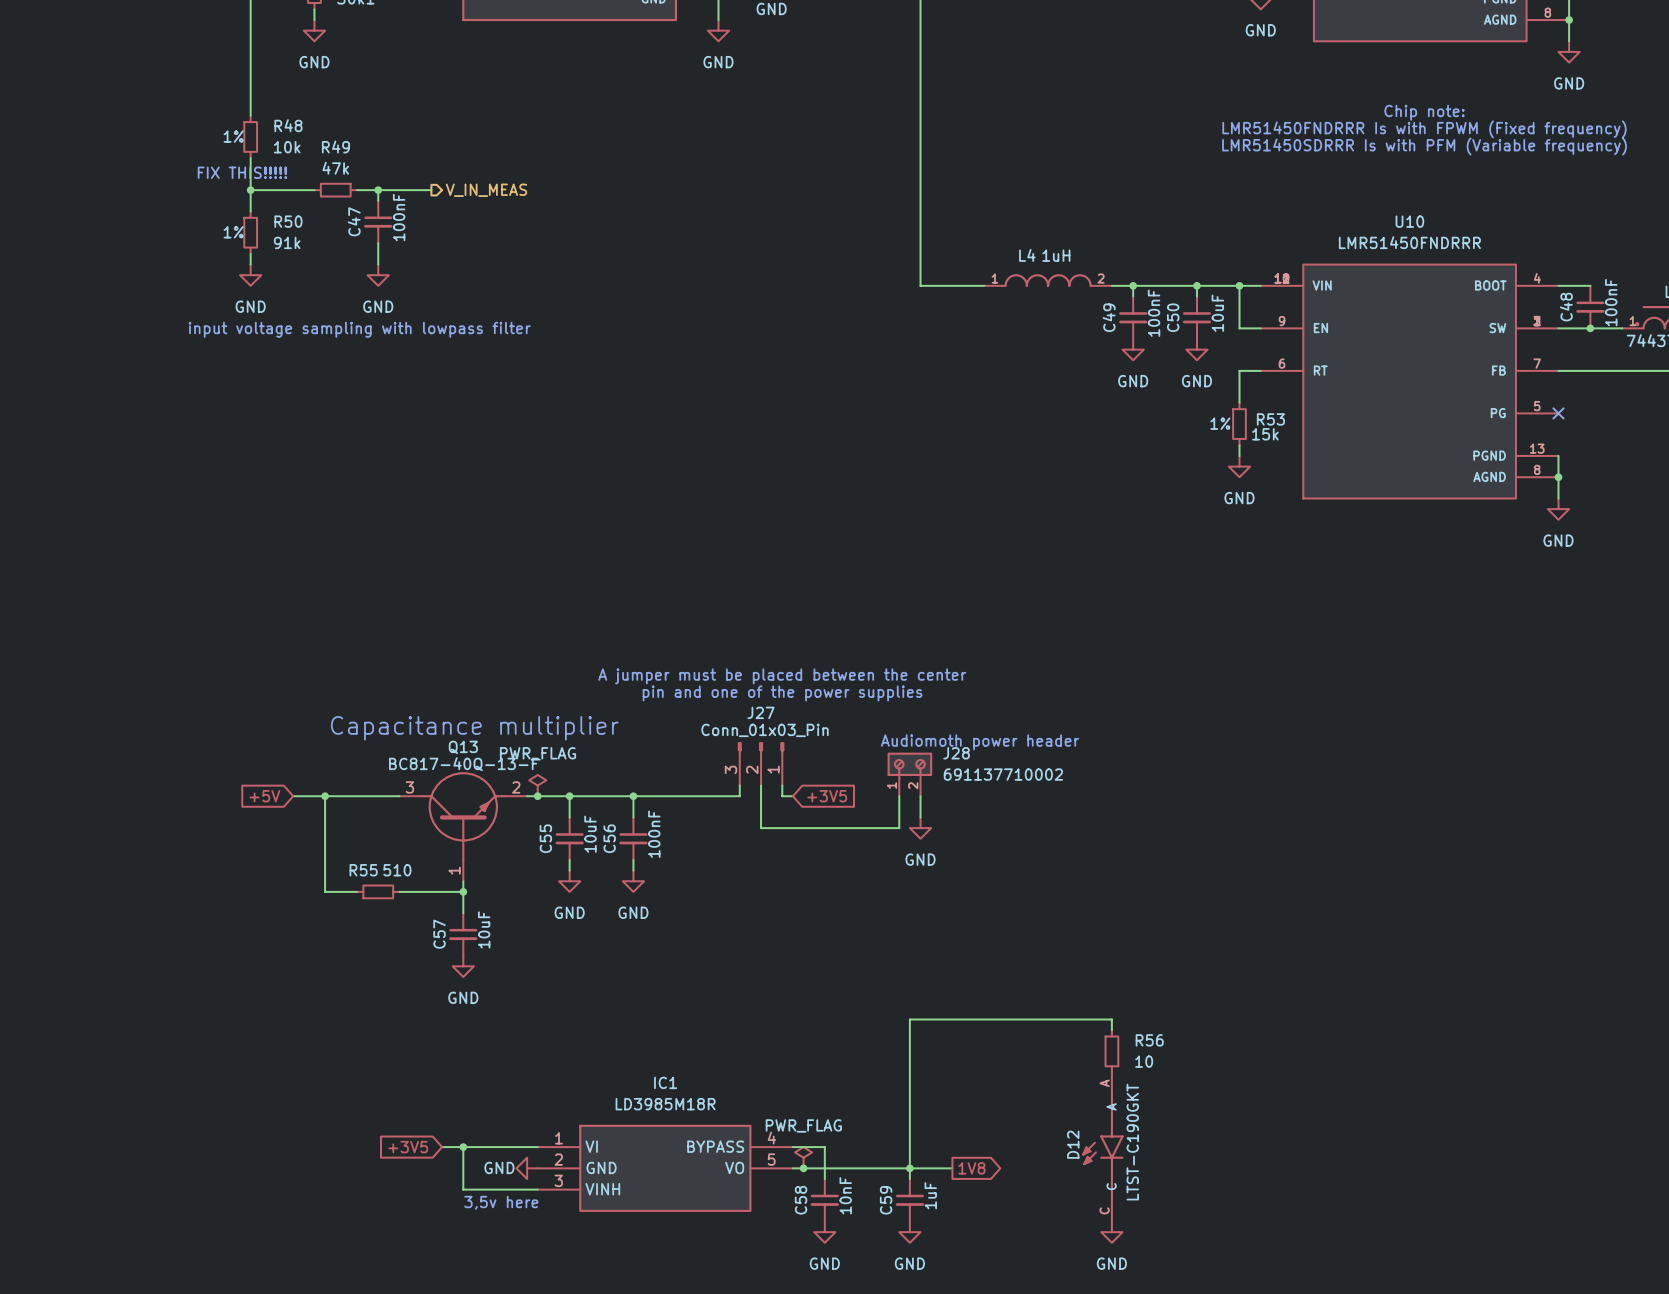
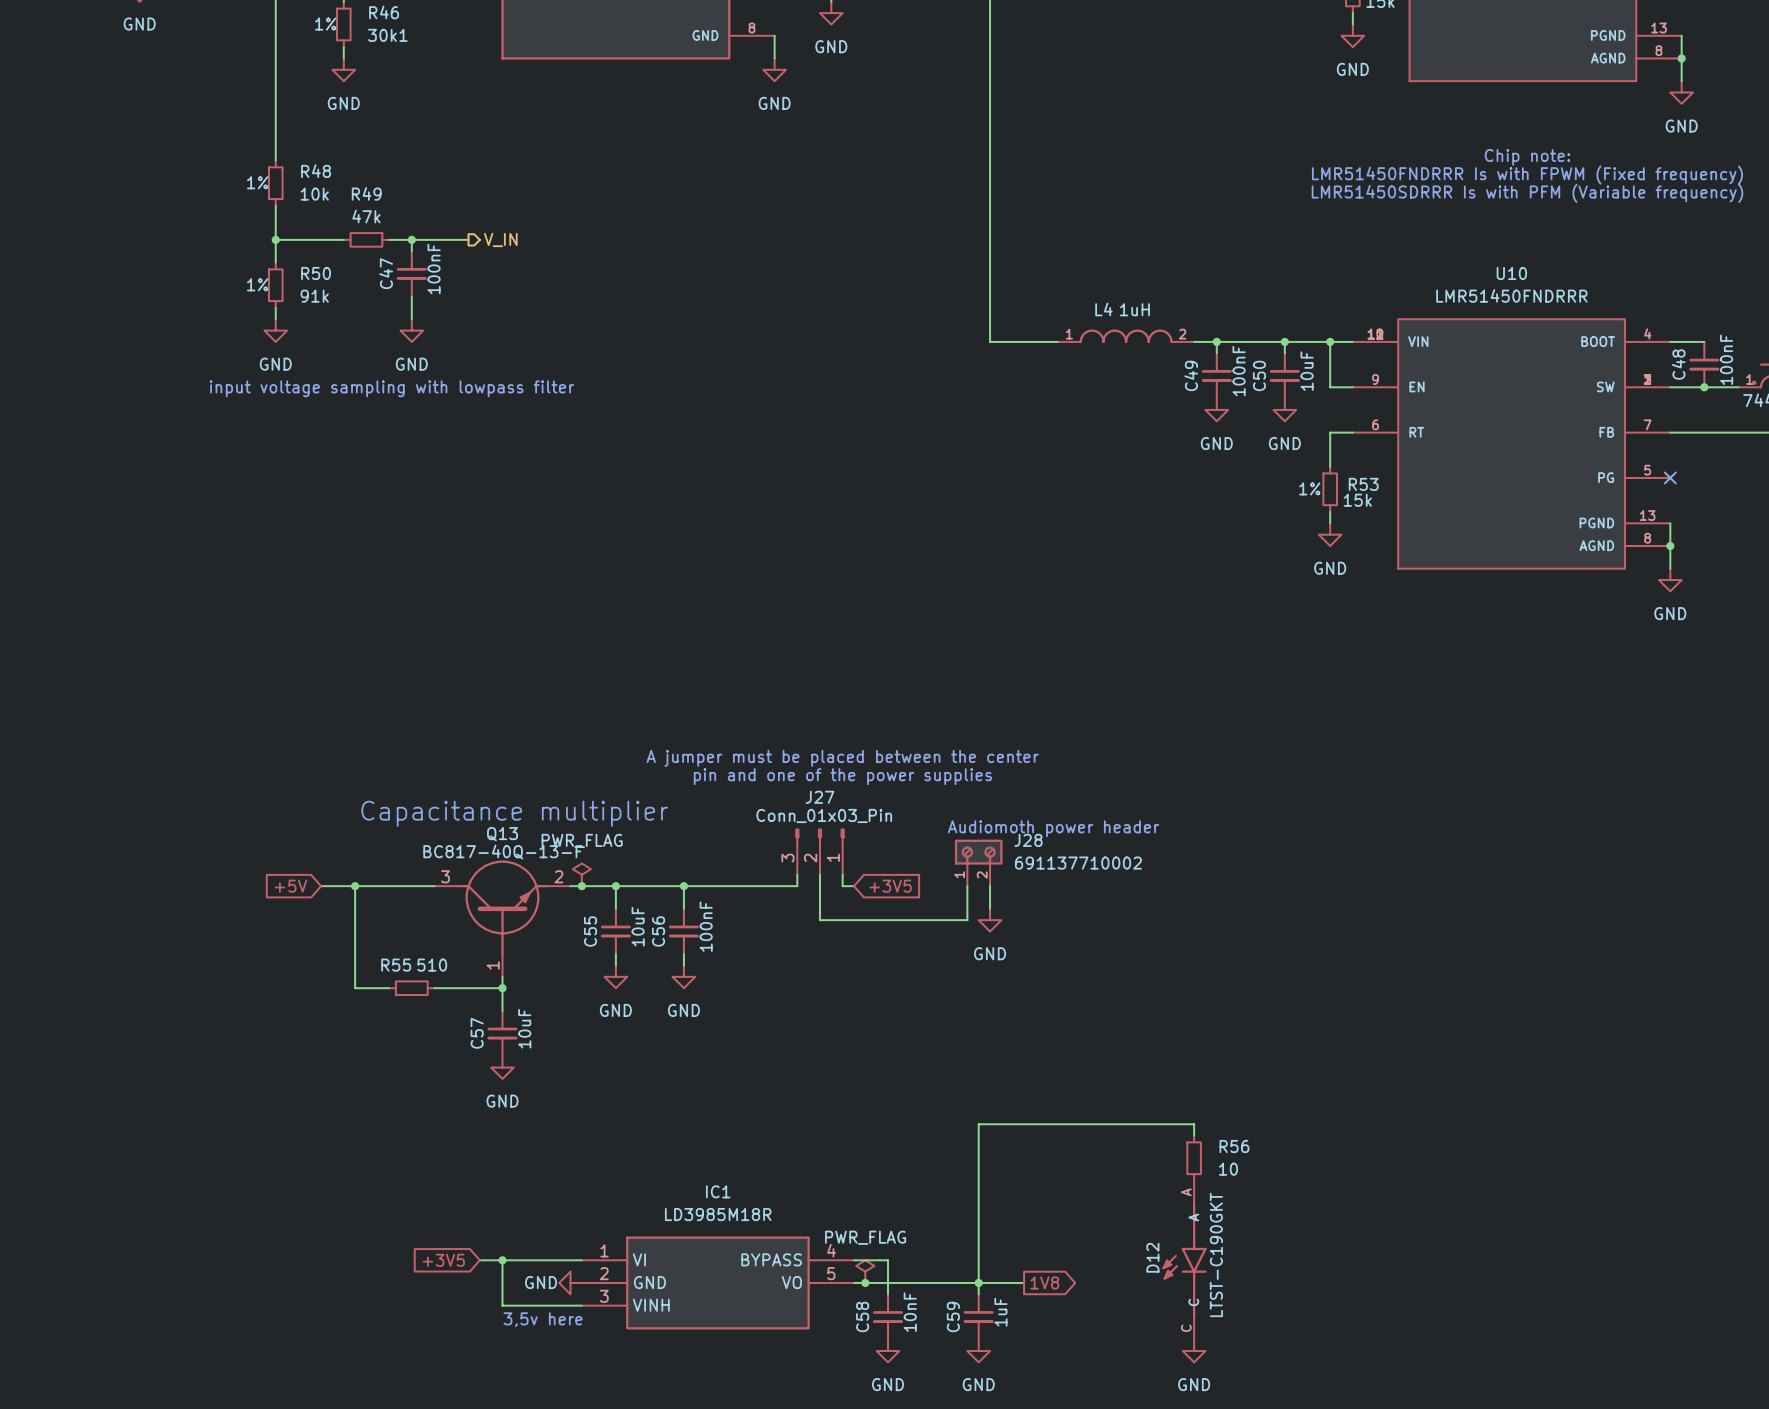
text: FIX THIS!!!!! (242, 172) -> none
hierarchical label: V_IN_MEAS (486, 190) -> V_IN (500, 240)

